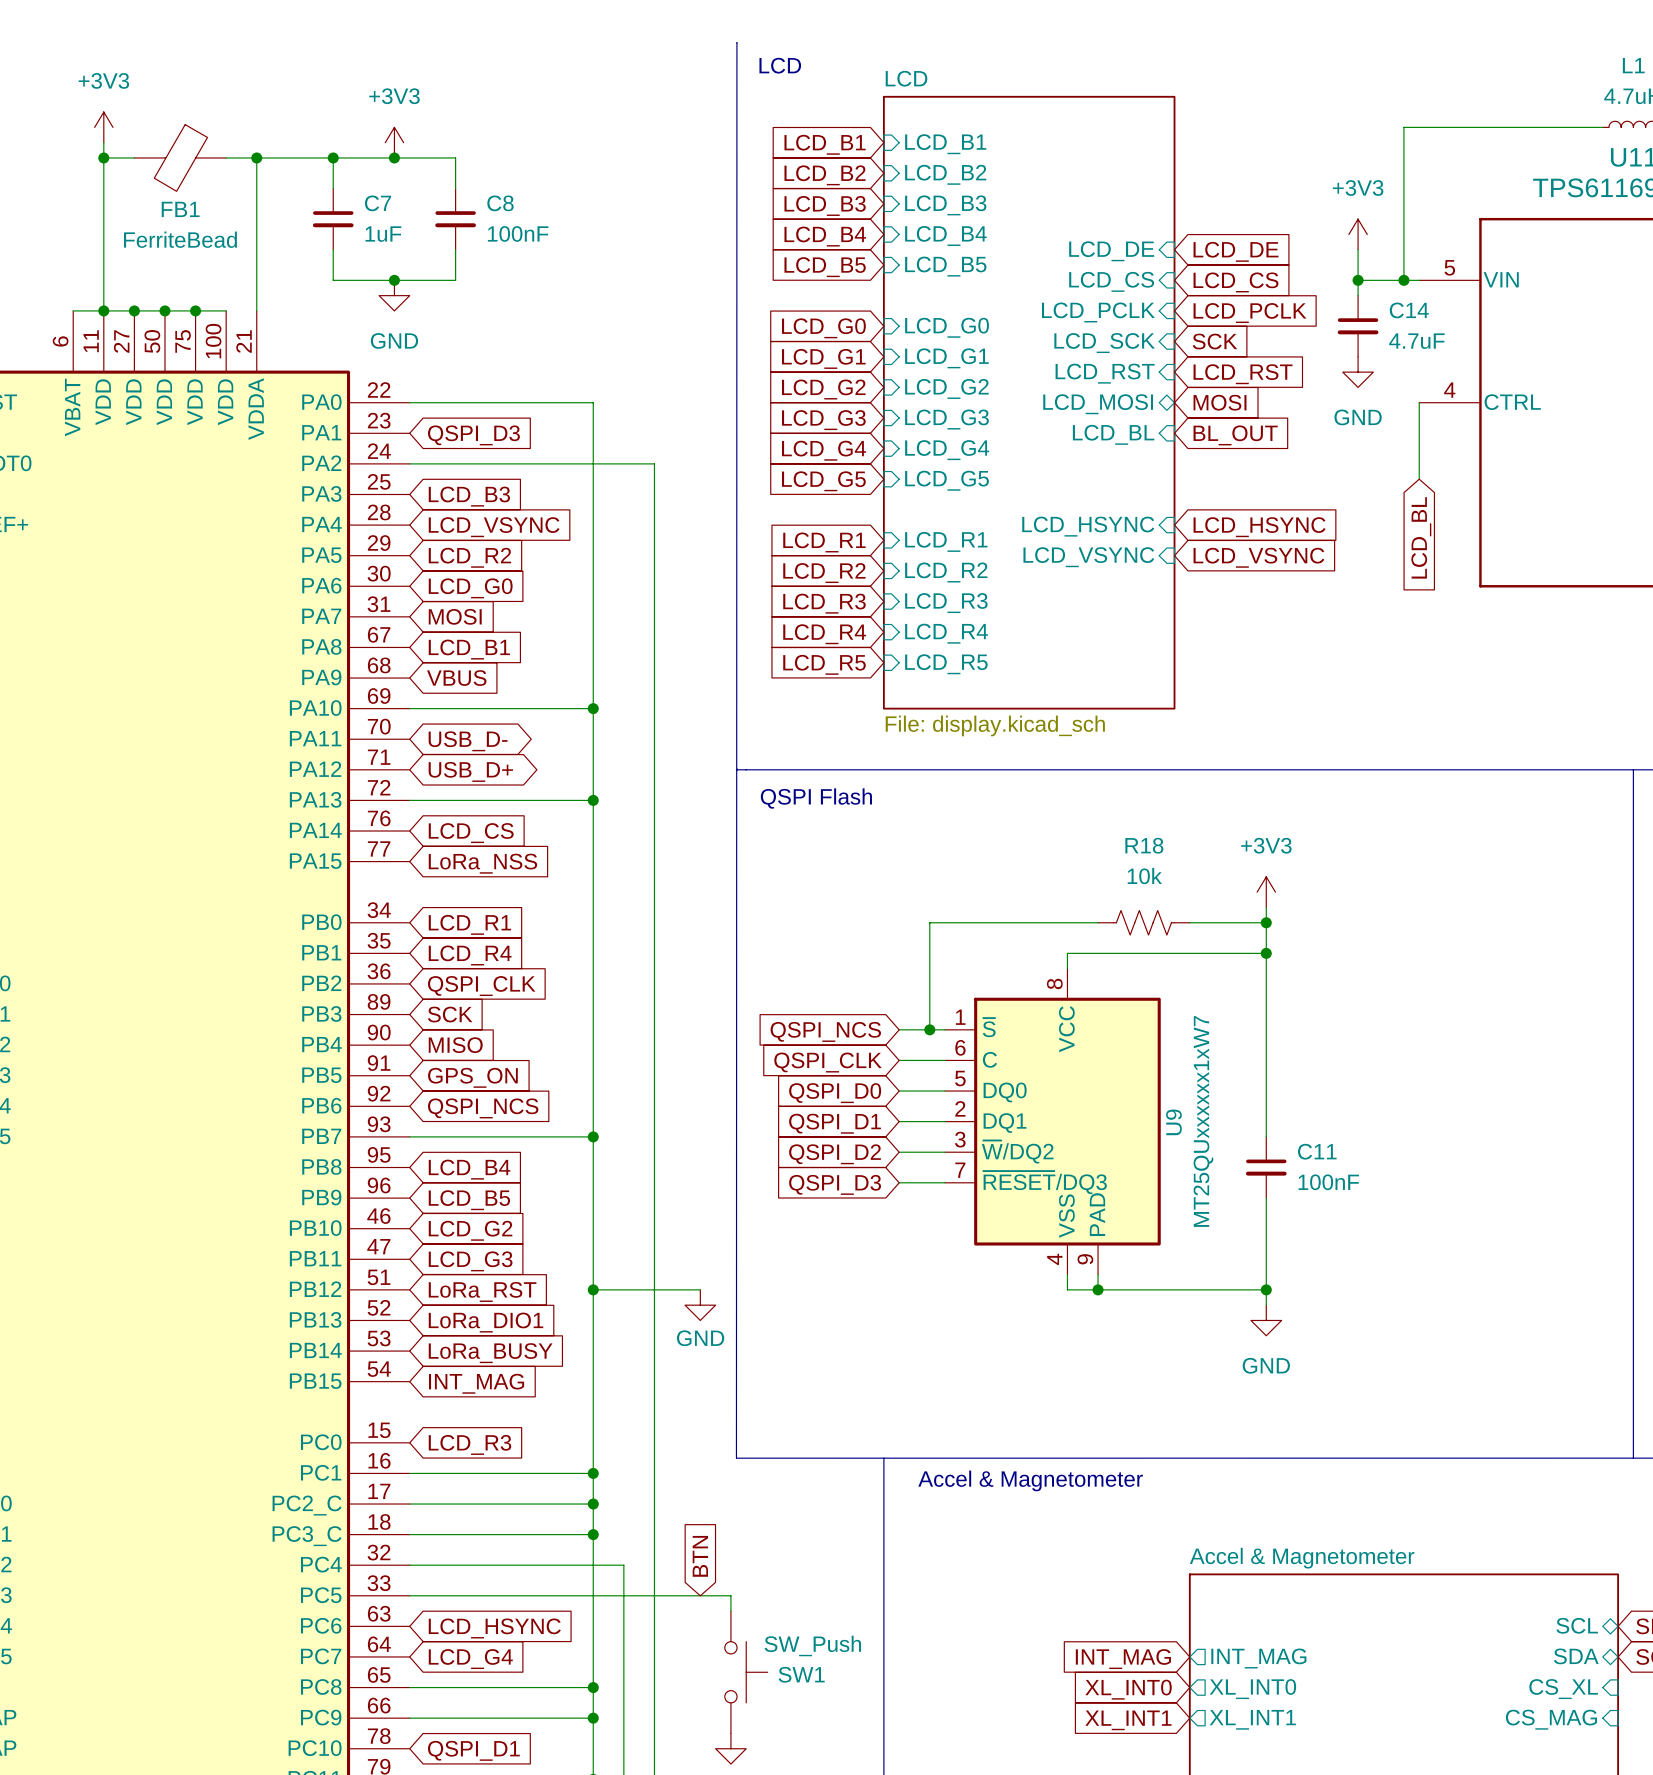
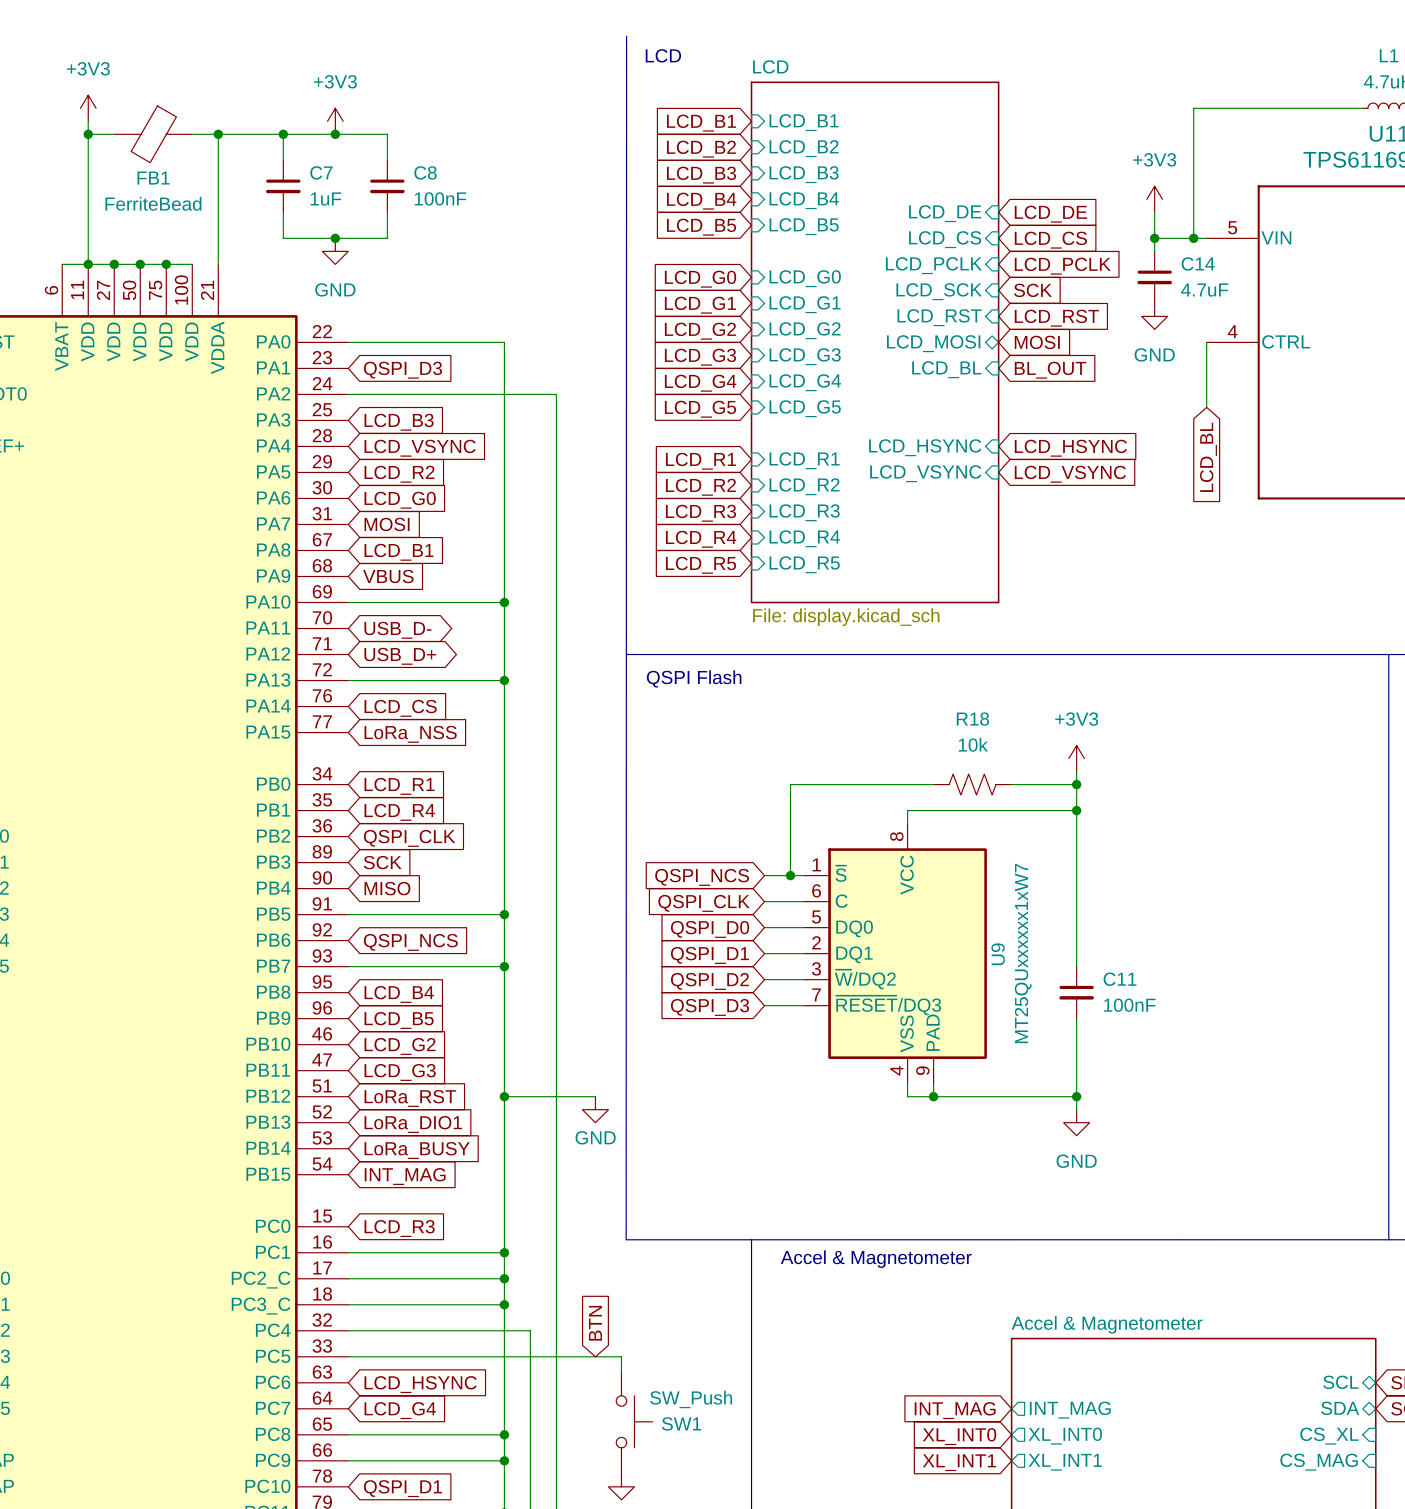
wire: none -> (348, 914) (504, 914)
junction: none -> (504, 914)
global label: GPS_ON (472, 1077) -> none

